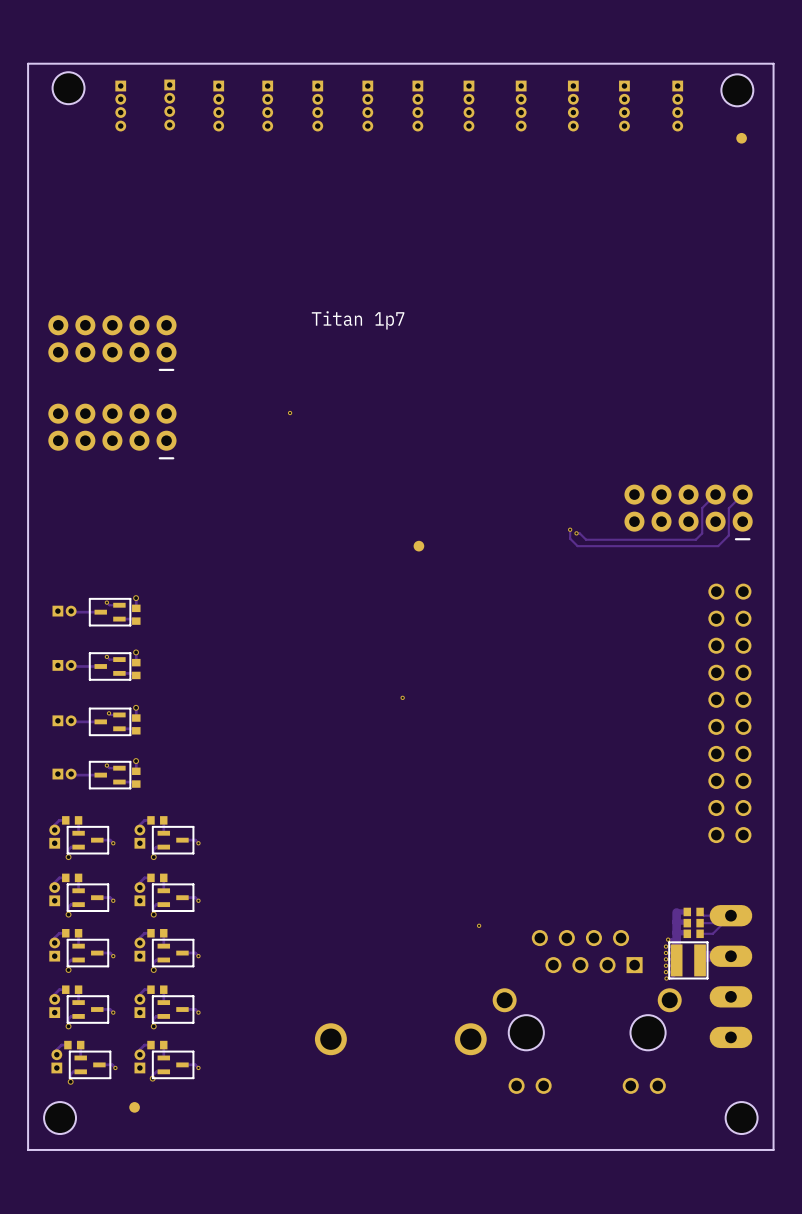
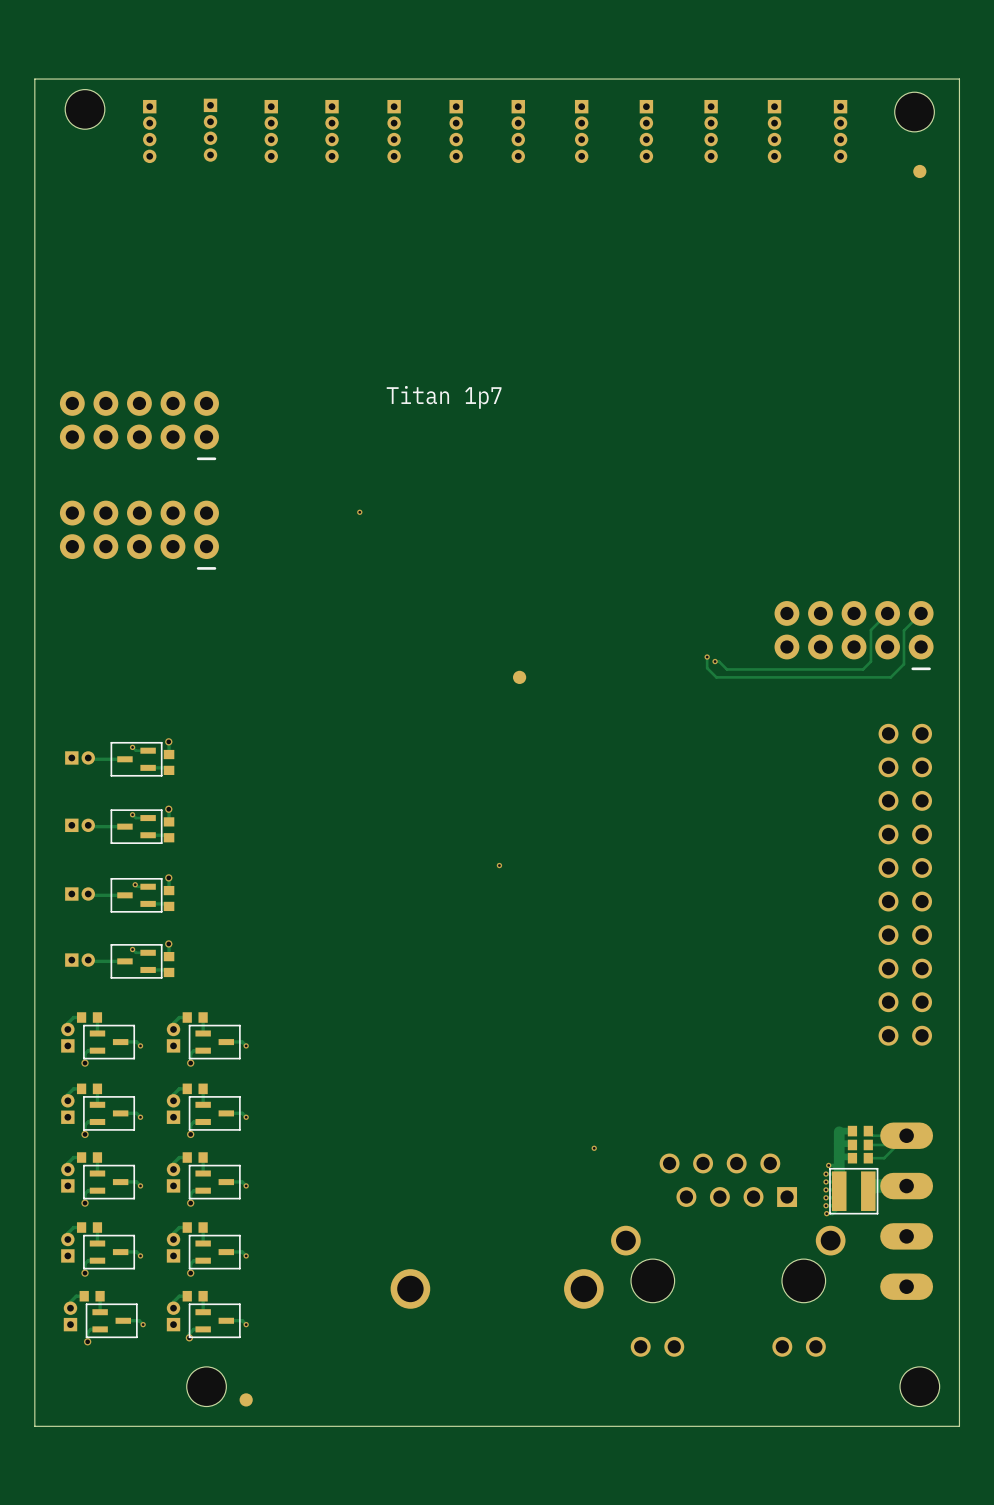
part position: (134, 1107) -> (246, 1399)
hole position: (60, 1118) -> (206, 1386)

